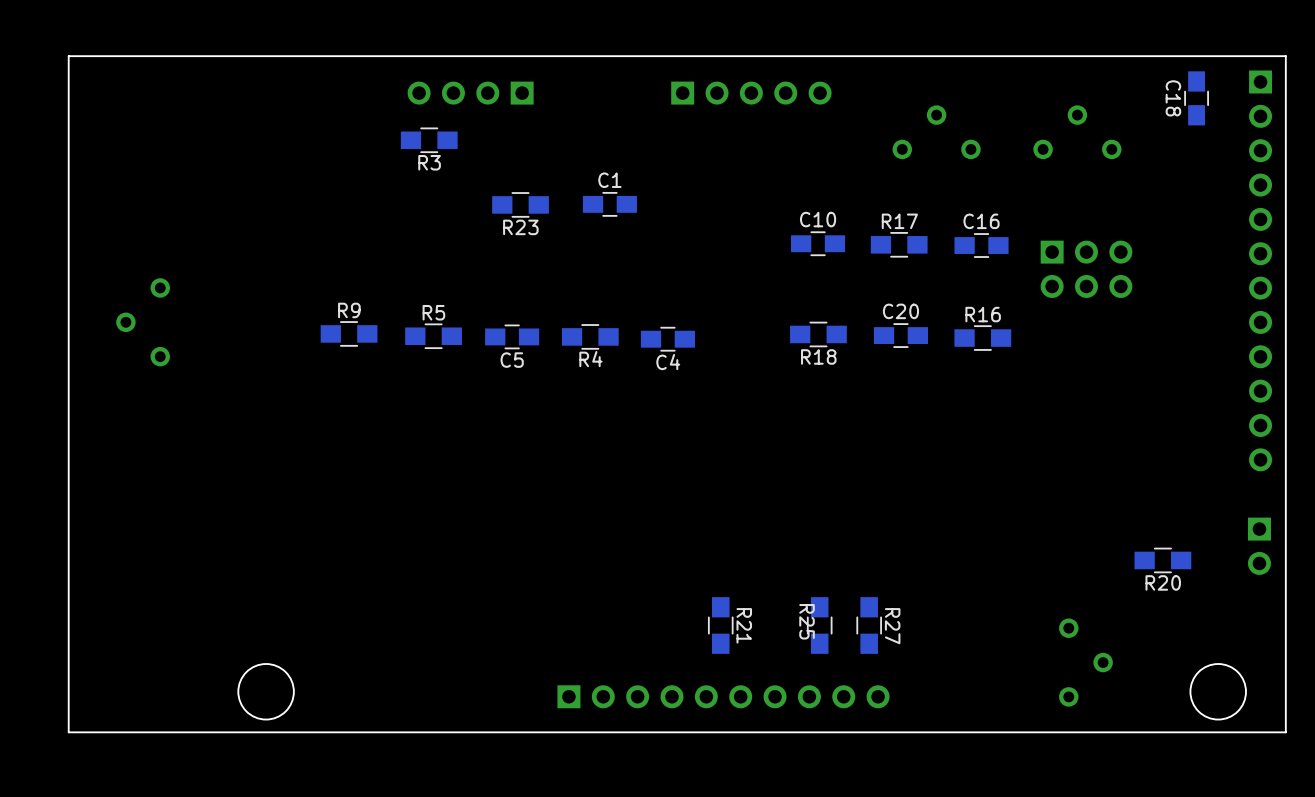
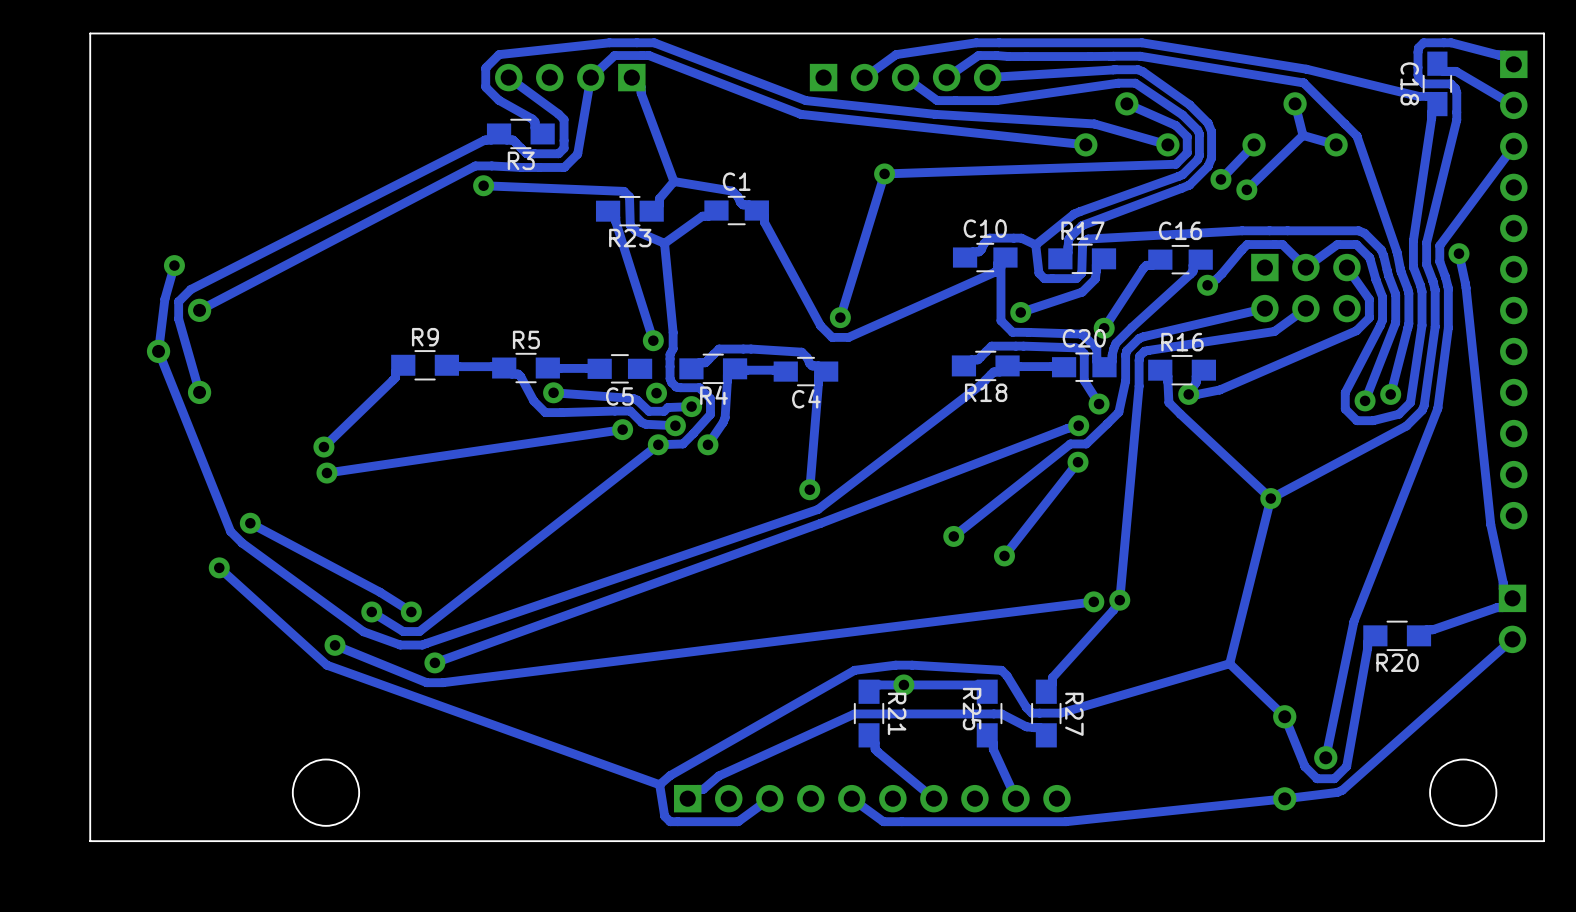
track: none -> (1437, 63) (1443, 71) (1456, 71) (1513, 105)
track: none -> (1513, 64) (1504, 55) (1451, 42) (1423, 42) (1418, 47) (1419, 79) (1423, 83) (1450, 83) (1456, 92) (1456, 120) (1426, 242) (1426, 264) (1435, 290) (1435, 326) (1424, 405) (1422, 410) (1406, 425) (1270, 498)
track: none -> (508, 77) (564, 119) (564, 148) (558, 153) (526, 153) (513, 140) (506, 140) (499, 133) (491, 140) (485, 140) (190, 289) (178, 301)
track: none -> (631, 77) (641, 86) (641, 93) (673, 181)
track: none -> (864, 77) (896, 54) (976, 42) (1141, 42) (1306, 69) (1418, 96) (1431, 96) (1437, 104) (1431, 111) (1413, 240) (1413, 266) (1422, 291) (1422, 325) (1410, 402) (1398, 414) (1373, 420) (1356, 420) (1345, 409) (1345, 392) (1382, 320) (1382, 297) (1376, 280)
track: none -> (905, 77) (937, 100) (996, 100) (1118, 83) (1135, 83) (1182, 115) (1197, 130) (1199, 155) (1182, 174) (1074, 214) (1035, 244)
track: none -> (946, 77) (978, 55) (1140, 56) (1303, 82)
track: none -> (987, 77) (1138, 69) (1189, 104) (1207, 123) (1211, 131) (1211, 158) (1207, 166) (1189, 184) (1081, 225) (1069, 238) (1068, 252) (1060, 258)
track: none -> (1303, 82) (1356, 136)
track: none -> (1126, 103) (1175, 125) (1187, 136) (1187, 152) (1175, 164) (884, 173) (840, 317)
track: none -> (1295, 103) (1303, 135)
track: none -> (542, 133) (534, 127) (534, 121) (532, 119) (498, 100) (486, 87) (485, 68) (498, 54) (609, 42) (654, 42) (805, 100) (934, 114) (1094, 123) (1167, 144)
track: none -> (1303, 135) (1336, 144)
track: none -> (1303, 135) (1246, 189)
track: none -> (1357, 136) (1396, 251) (1401, 271) (1408, 293) (1408, 323) (1390, 394)
track: none -> (1085, 144) (800, 114) (649, 55) (614, 55) (590, 77) (577, 153) (564, 167) (475, 165) (199, 310)
track: none -> (1254, 144) (1220, 179)
track: none -> (1513, 146) (1439, 245) (1439, 261) (1448, 289) (1448, 327) (1437, 407) (1353, 621) (1325, 757)
via: none -> (884, 173)
via: none -> (1220, 179)
track: none -> (673, 181) (659, 198) (659, 205) (651, 211)
track: none -> (673, 181) (732, 191) (742, 204) (749, 204) (764, 216) (764, 222) (820, 325) (832, 337) (848, 337) (995, 272) (997, 269) (997, 263) (1005, 257) (1000, 263) (1000, 320) (1012, 332) (1081, 334) (1096, 348) (1096, 361) (1104, 367) (1112, 361) (1115, 343) (1190, 274) (1193, 271) (1193, 265) (1200, 259)
track: none -> (483, 185) (624, 191) (629, 196) (630, 225) (635, 230) (664, 243)
via: none -> (483, 185)
via: none -> (1246, 189)
track: none -> (608, 211) (615, 217) (653, 340)
track: none -> (716, 210) (708, 216) (702, 216) (664, 243)
track: none -> (664, 243) (673, 332) (673, 348) (670, 354) (670, 378) (676, 387) (699, 387) (710, 398) (710, 414) (682, 443) (658, 444) (419, 631) (403, 631) (371, 611)
track: none -> (1035, 244) (1021, 238) (989, 238) (979, 251) (972, 251) (965, 257)
track: none -> (1035, 244) (1038, 273) (1044, 278) (1076, 278) (1081, 273) (1082, 244) (1088, 239) (1242, 230) (1358, 230) (1364, 233) (1381, 249) (1395, 294) (1395, 323) (1365, 400)
track: none -> (1458, 253) (1466, 287) (1490, 524) (1503, 589) (1512, 598) (1503, 607) (1496, 607) (1432, 629) (1426, 629) (1418, 635)
via: none -> (1458, 253)
track: none -> (1103, 258) (1096, 264) (1095, 279) (1082, 291) (1020, 312)
track: none -> (1160, 259) (1152, 265) (1146, 265) (1143, 267) (1104, 328)
track: none -> (174, 265) (164, 299) (158, 351) (230, 531) (242, 543) (363, 631) (400, 645) (422, 645) (817, 509) (979, 385) (993, 371) (999, 371) (1007, 365) (1064, 367)
via: none -> (174, 265)
track: none -> (1346, 267) (1369, 299) (1369, 317) (1356, 330) (1219, 389) (1188, 394) (1196, 382) (1196, 376) (1203, 370)
track: none -> (1376, 280) (1369, 257) (1355, 244) (1336, 244) (1305, 267) (1282, 244) (1247, 244) (1222, 273) (1207, 285)
via: none -> (1207, 285)
track: none -> (178, 301) (178, 318) (199, 392)
track: none -> (1264, 308) (1139, 338) (1126, 350) (1125, 355) (1125, 381) (1118, 412) (1086, 443) (1070, 443) (953, 536)
track: none -> (1305, 308) (1273, 331) (1148, 350) (1144, 351) (1139, 356) (1139, 386) (1119, 600) (1113, 610) (1052, 677) (1052, 684) (1046, 691)
via: none -> (1020, 312)
via: none -> (840, 317)
via: none -> (1104, 328)
via: none -> (653, 340)
track: none -> (403, 365) (395, 371) (395, 377) (323, 447)
track: none -> (446, 365) (496, 366) (504, 368) (511, 374) (518, 374) (533, 400) (545, 412) (630, 411) (645, 424) (675, 425)
track: none -> (963, 365) (971, 359) (977, 359) (991, 346) (1075, 347) (1084, 353) (1084, 380) (1099, 404)
track: none -> (547, 368) (599, 368)
track: none -> (691, 368) (699, 362) (705, 362) (719, 349) (751, 349) (801, 352) (812, 365) (818, 365) (826, 371) (818, 377) (809, 489)
track: none -> (1160, 370) (1167, 376) (1168, 402) (1270, 498)
track: none -> (785, 371) (735, 368) (727, 374) (725, 417) (707, 444)
track: none -> (553, 392) (633, 398) (649, 411) (664, 411) (667, 407) (691, 406)
via: none -> (553, 392)
via: none -> (656, 393)
via: none -> (1188, 394)
via: none -> (1390, 394)
via: none -> (1365, 400)
via: none -> (1099, 404)
via: none -> (691, 406)
via: none -> (675, 425)
track: none -> (1078, 425) (820, 523) (434, 662)
via: none -> (1078, 425)
track: none -> (622, 429) (326, 473)
via: none -> (622, 429)
via: none -> (658, 444)
via: none -> (707, 444)
via: none -> (323, 447)
track: none -> (1078, 462) (1004, 555)
via: none -> (1078, 462)
via: none -> (326, 473)
via: none -> (809, 489)
track: none -> (1270, 498) (1229, 663)
via: none -> (1270, 498)
track: none -> (250, 523) (379, 592) (411, 611)
via: none -> (250, 523)
via: none -> (953, 536)
via: none -> (1004, 555)
track: none -> (219, 567) (326, 665) (659, 784)
via: none -> (219, 567)
via: none -> (1119, 600)
track: none -> (1093, 601) (443, 682) (426, 682) (335, 645)
via: none -> (1093, 601)
via: none -> (371, 611)
via: none -> (411, 611)
track: none -> (1375, 635) (1367, 641) (1346, 766)
track: none -> (1512, 639) (1342, 790) (1337, 792) (1066, 821) (883, 821) (851, 798)
via: none -> (335, 645)
via: none -> (434, 662)
track: none -> (1229, 663) (1060, 713) (1031, 713) (1001, 670) (912, 665) (854, 670) (670, 775) (659, 784)
track: none -> (1229, 663) (1284, 716) (1304, 766)
via: none -> (903, 684)
track: none -> (987, 691) (981, 684) (875, 684) (869, 691)
track: none -> (869, 735) (875, 743) (875, 749) (877, 751) (933, 798)
track: none -> (987, 735) (993, 743) (993, 749) (1015, 798)
track: none -> (1046, 735) (1040, 727) (1026, 726) (1001, 713) (854, 713) (718, 776) (703, 789) (697, 789) (687, 798)
track: none -> (1304, 766) (1317, 778)
track: none -> (1346, 766) (1334, 778)
track: none -> (1334, 778) (1317, 778)
track: none -> (659, 784) (664, 816) (670, 821) (737, 821) (769, 798)

